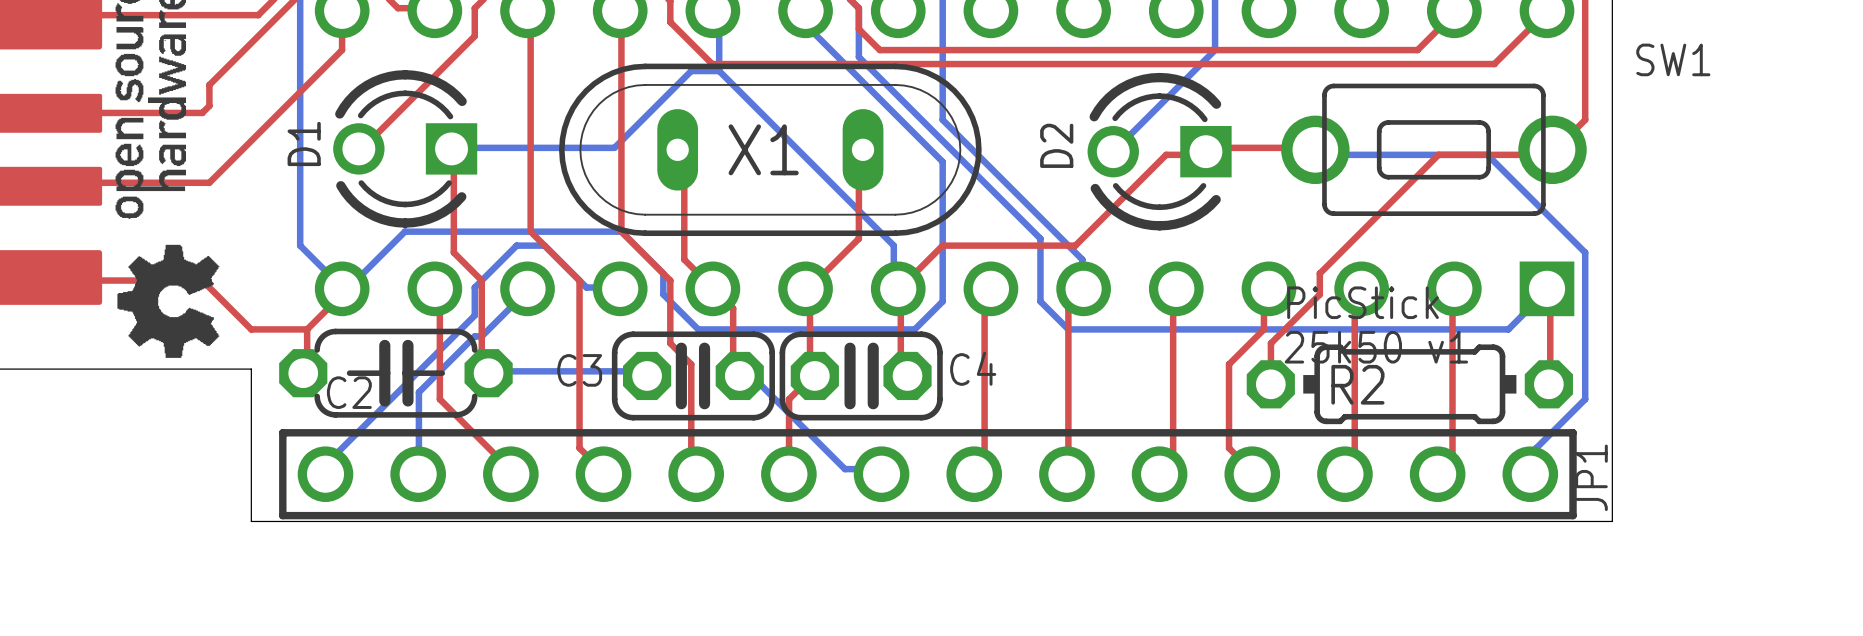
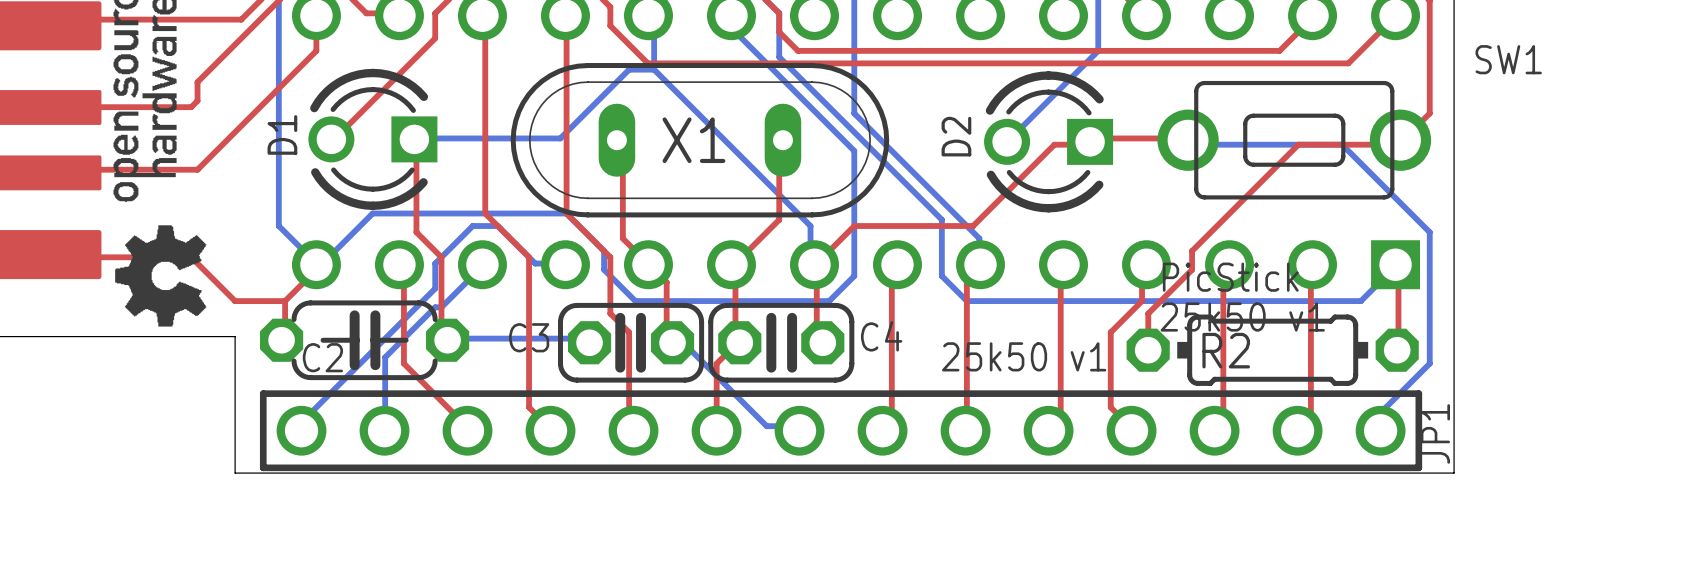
text: none -> 25k50 v1 (1024, 356)

